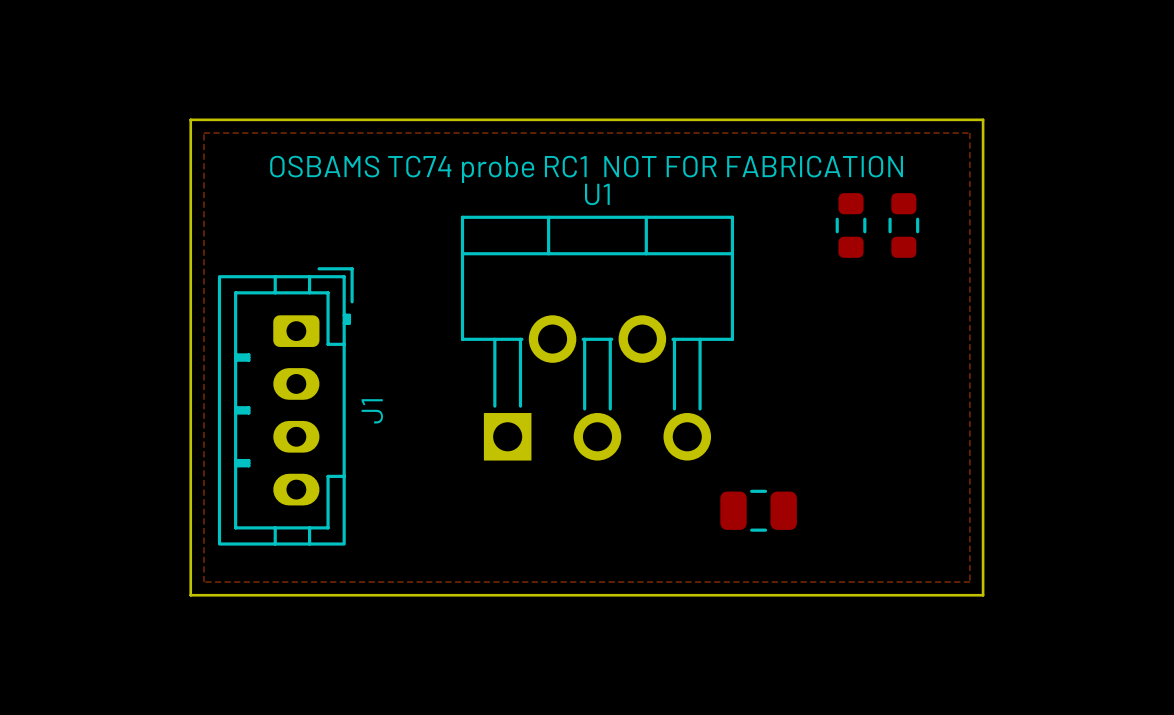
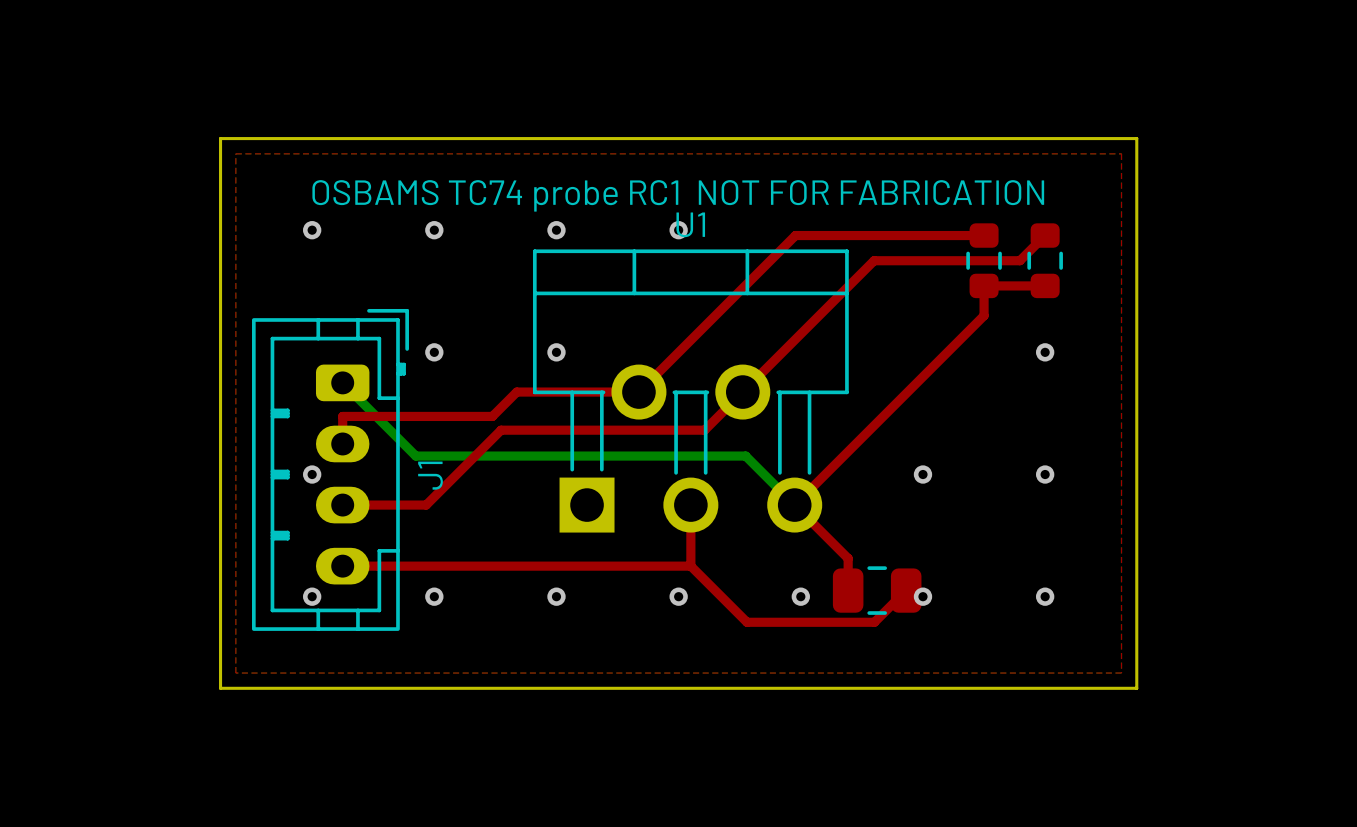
via: none -> (312, 230)
via: none -> (434, 230)
via: none -> (556, 230)
via: none -> (678, 230)
top track: none -> (984, 235) (795, 235) (638, 392) (516, 392) (492, 416) (342, 416) (342, 443)
top track: none -> (1045, 235) (1019, 260) (874, 260) (704, 430) (501, 430) (426, 505) (342, 505)
top track: none -> (1045, 285) (984, 285) (984, 315) (794, 505) (848, 558) (848, 590)
via: none -> (434, 352)
via: none -> (556, 352)
via: none -> (1045, 352)
bottom track: none -> (342, 382) (415, 456) (745, 456) (794, 505)
via: none -> (312, 474)
via: none -> (922, 474)
via: none -> (1045, 474)
top track: none -> (690, 505) (690, 566)
top track: none -> (342, 566) (690, 566)
top track: none -> (690, 566) (747, 622) (874, 622) (906, 590)
via: none -> (312, 596)
via: none -> (434, 596)
via: none -> (556, 596)
via: none -> (678, 596)
via: none -> (800, 596)
via: none -> (922, 596)
via: none -> (1045, 596)

